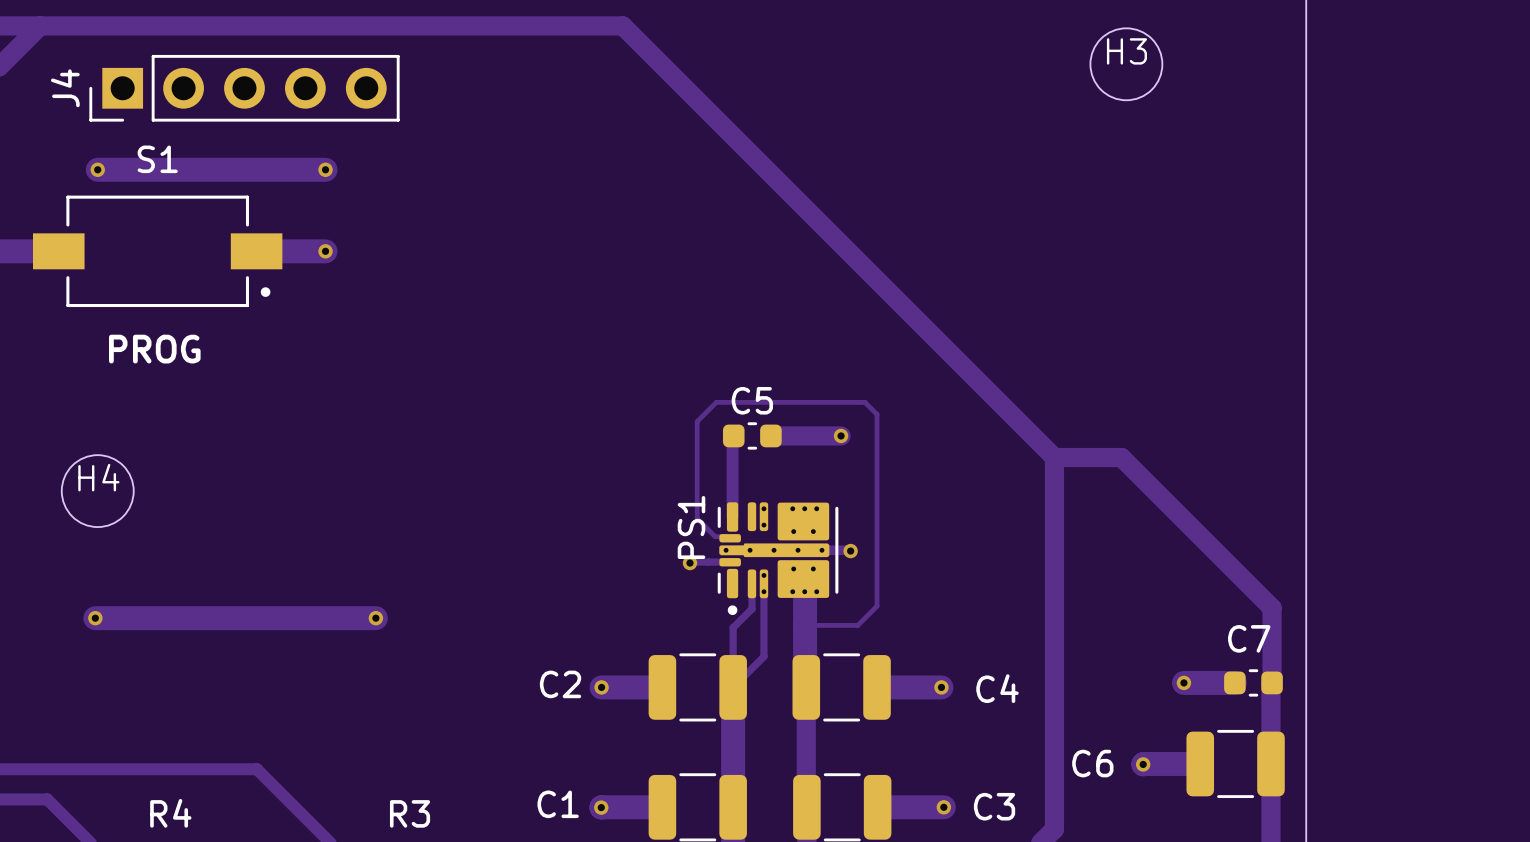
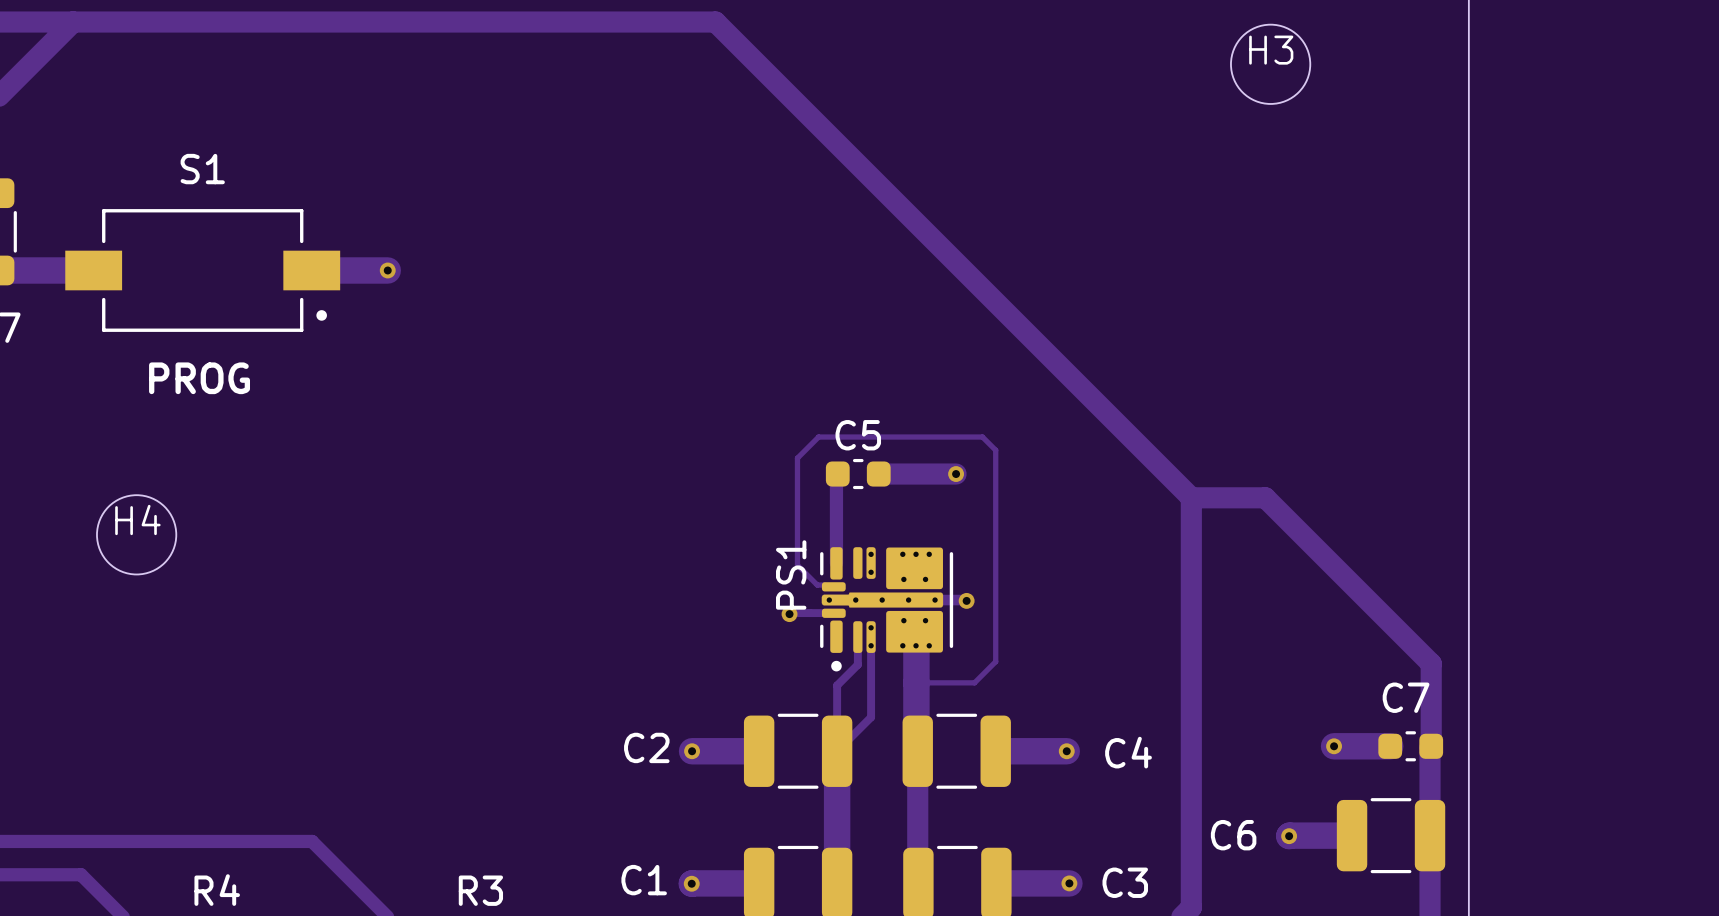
J4: (244, 88) -> none
track: (97, 169) (325, 169) -> none
via: (97, 169) -> none
via: (325, 169) -> none
track: (95, 618) (375, 618) -> none
via: (95, 618) -> none
via: (375, 618) -> none

